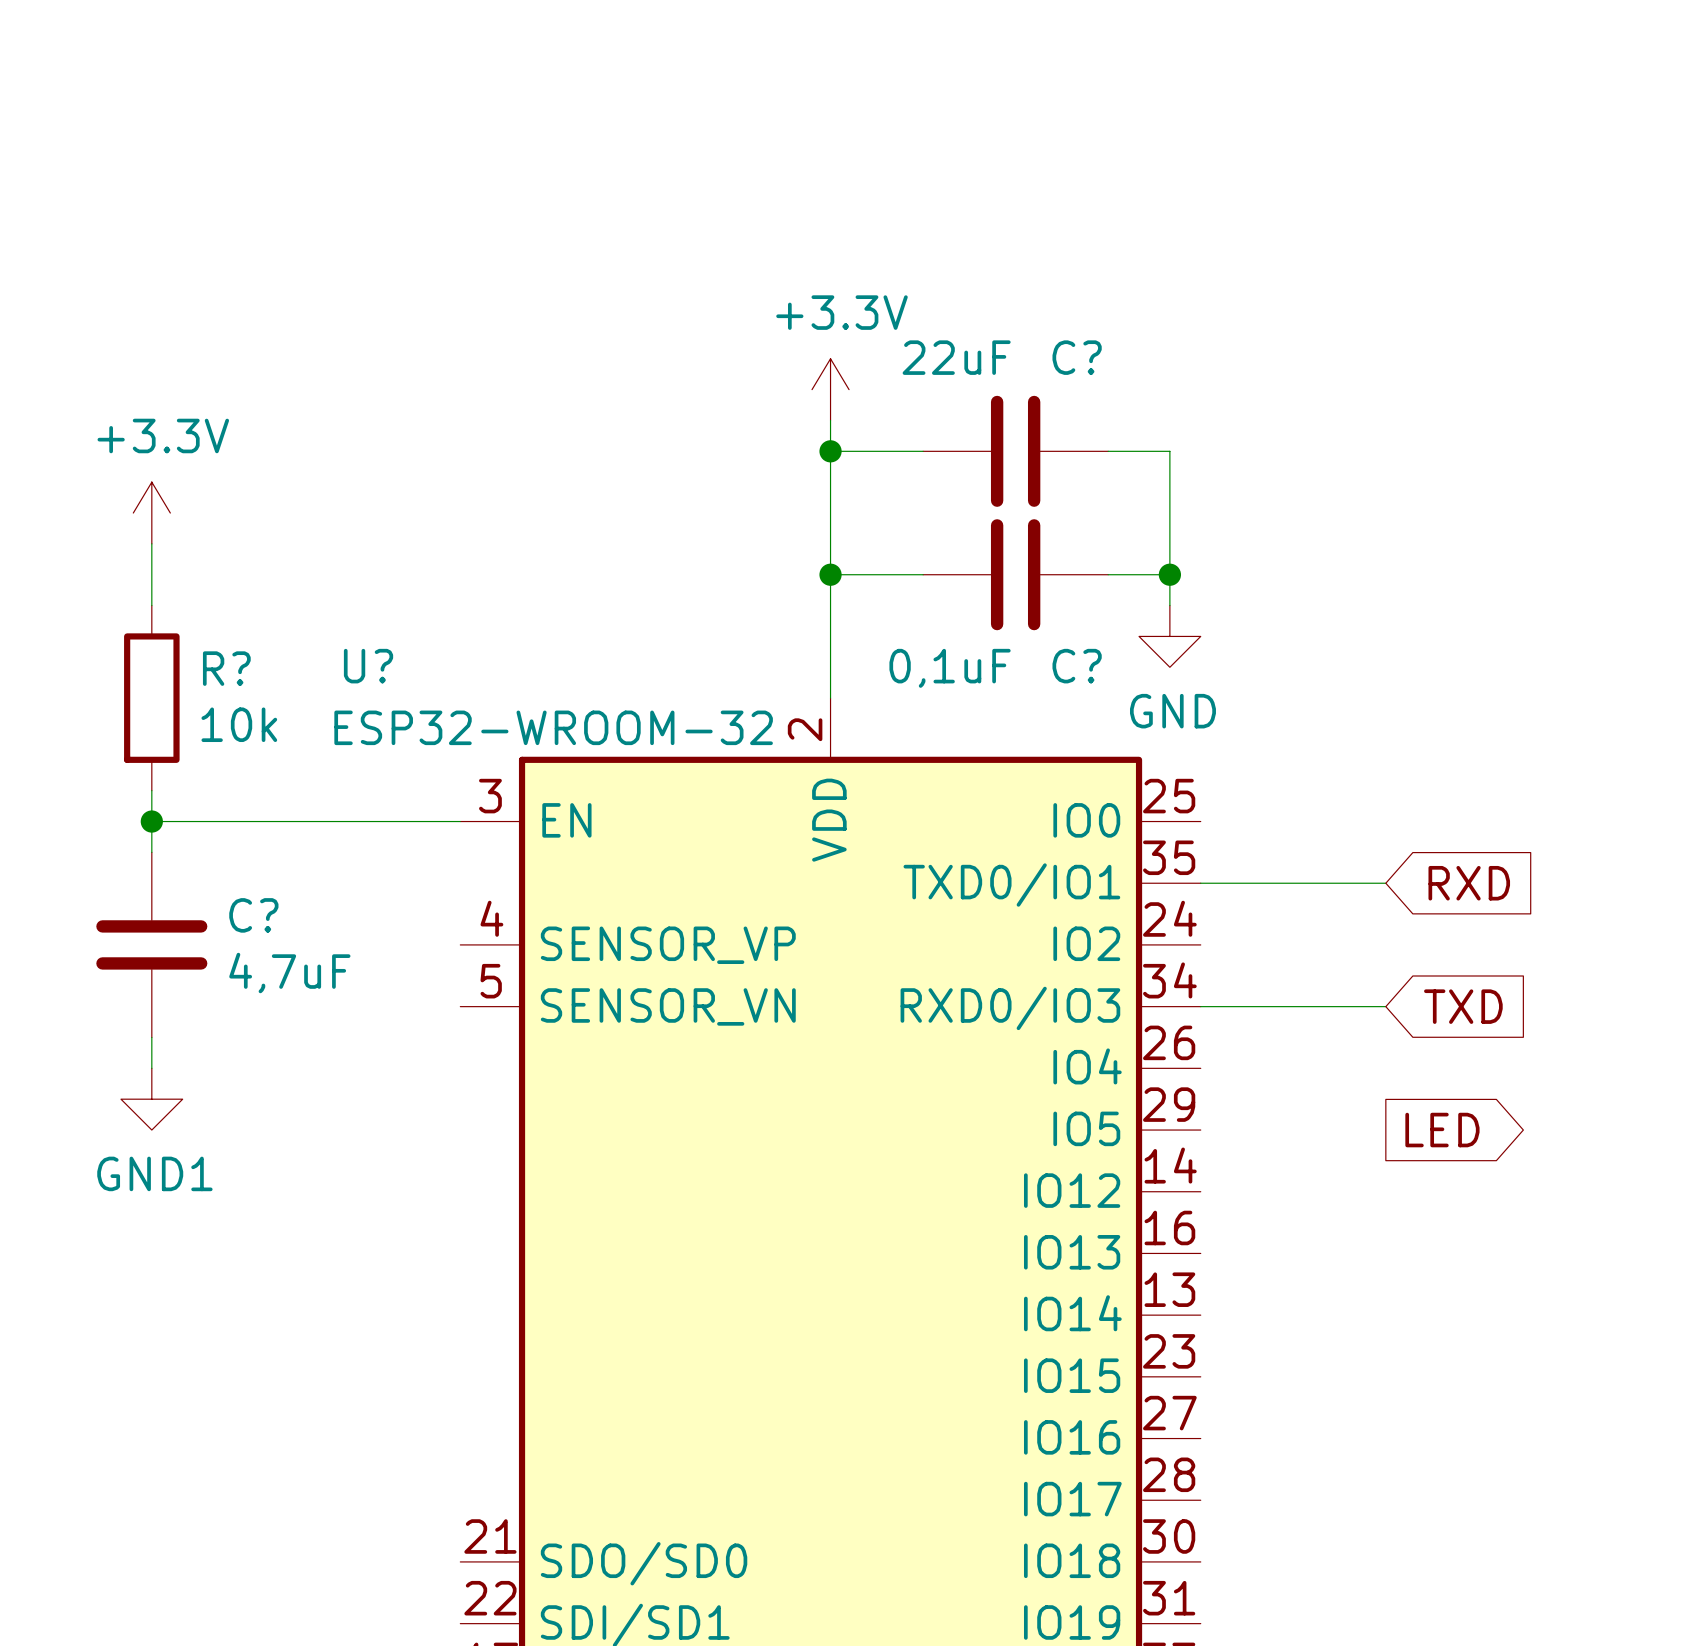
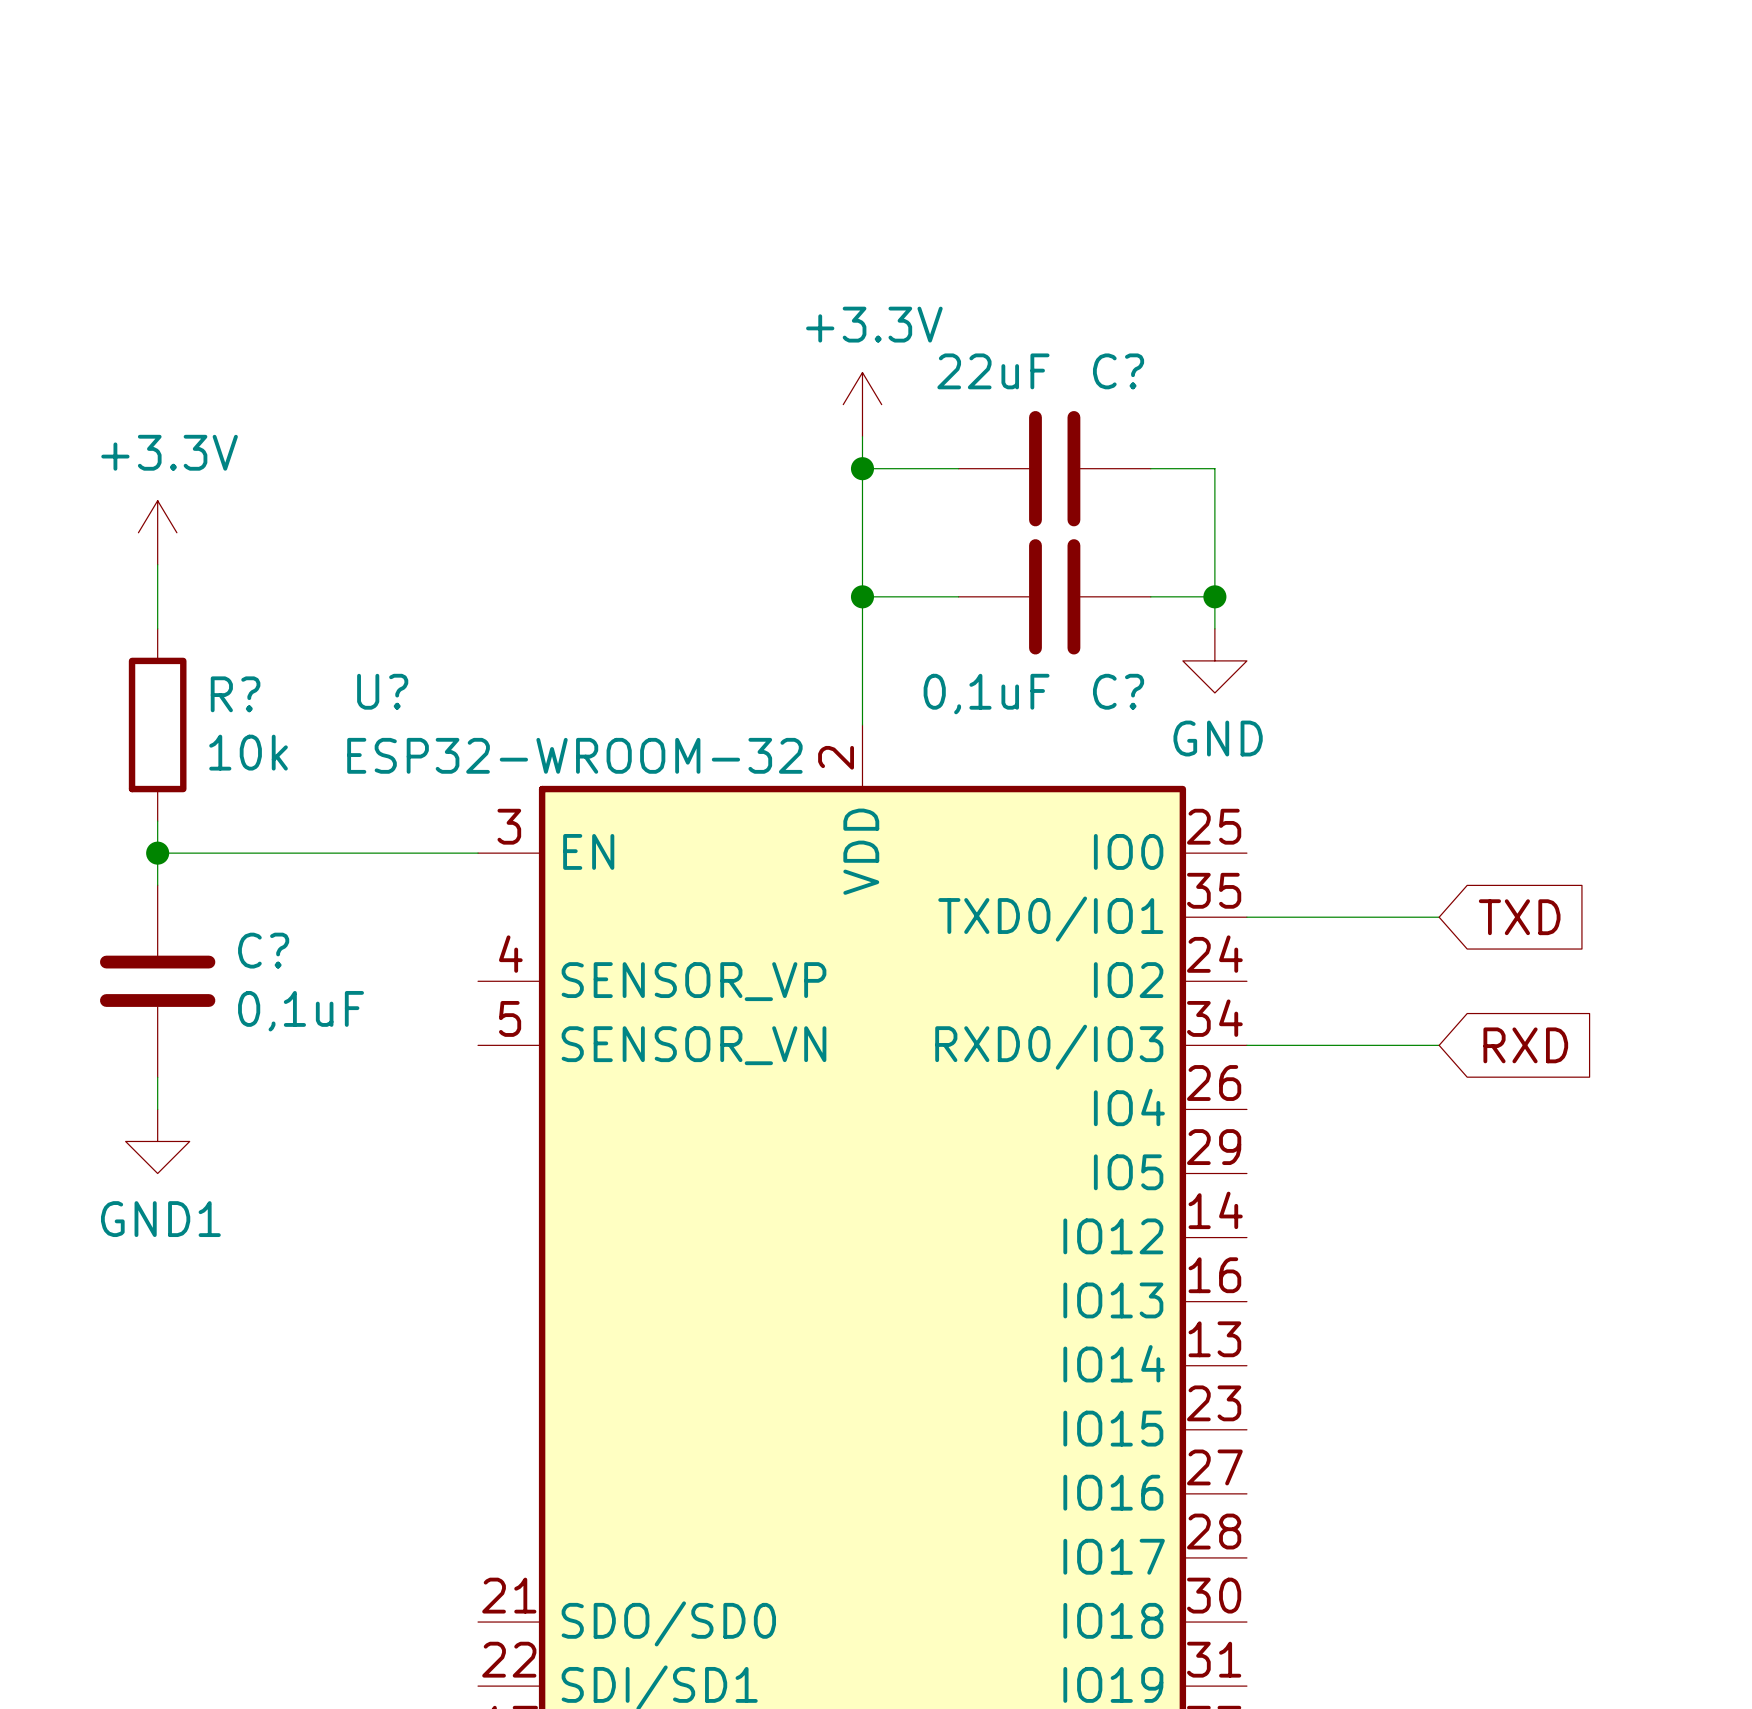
global label: RXD (1469, 883) -> TXD (1519, 917)
C? value: 4,7uF (289, 973) -> 0,1uF (301, 1011)
global label: TXD (1463, 1006) -> RXD (1525, 1045)
global label: LED (1442, 1130) -> none

